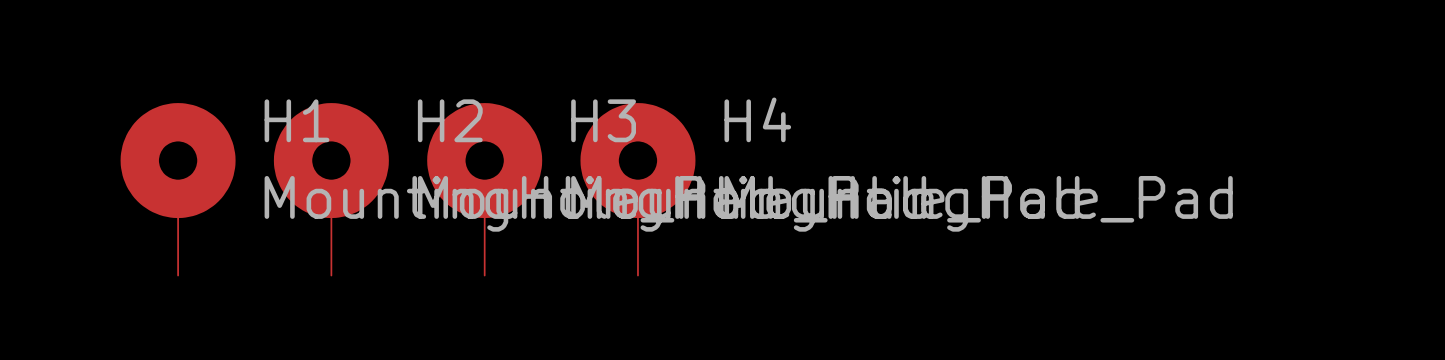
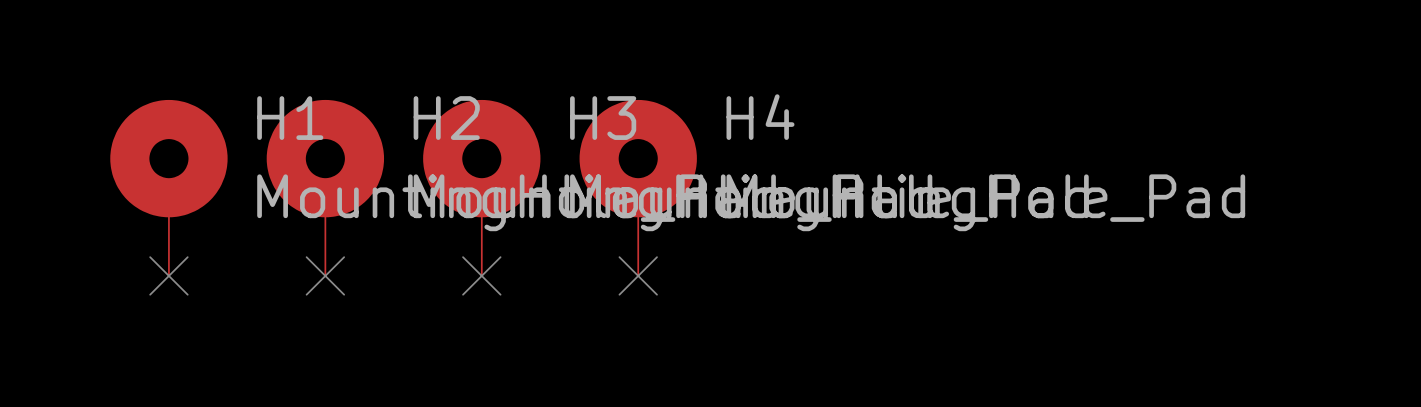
no-connect mark: none -> (168, 275)
no-connect mark: none -> (325, 275)
no-connect mark: none -> (481, 275)
no-connect mark: none -> (638, 275)

